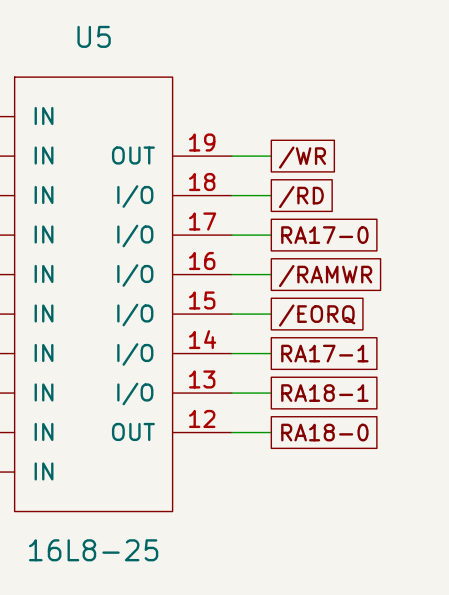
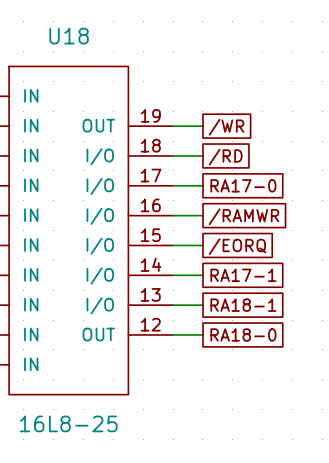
U5 name: U5 (94, 36) -> U18 (69, 36)

